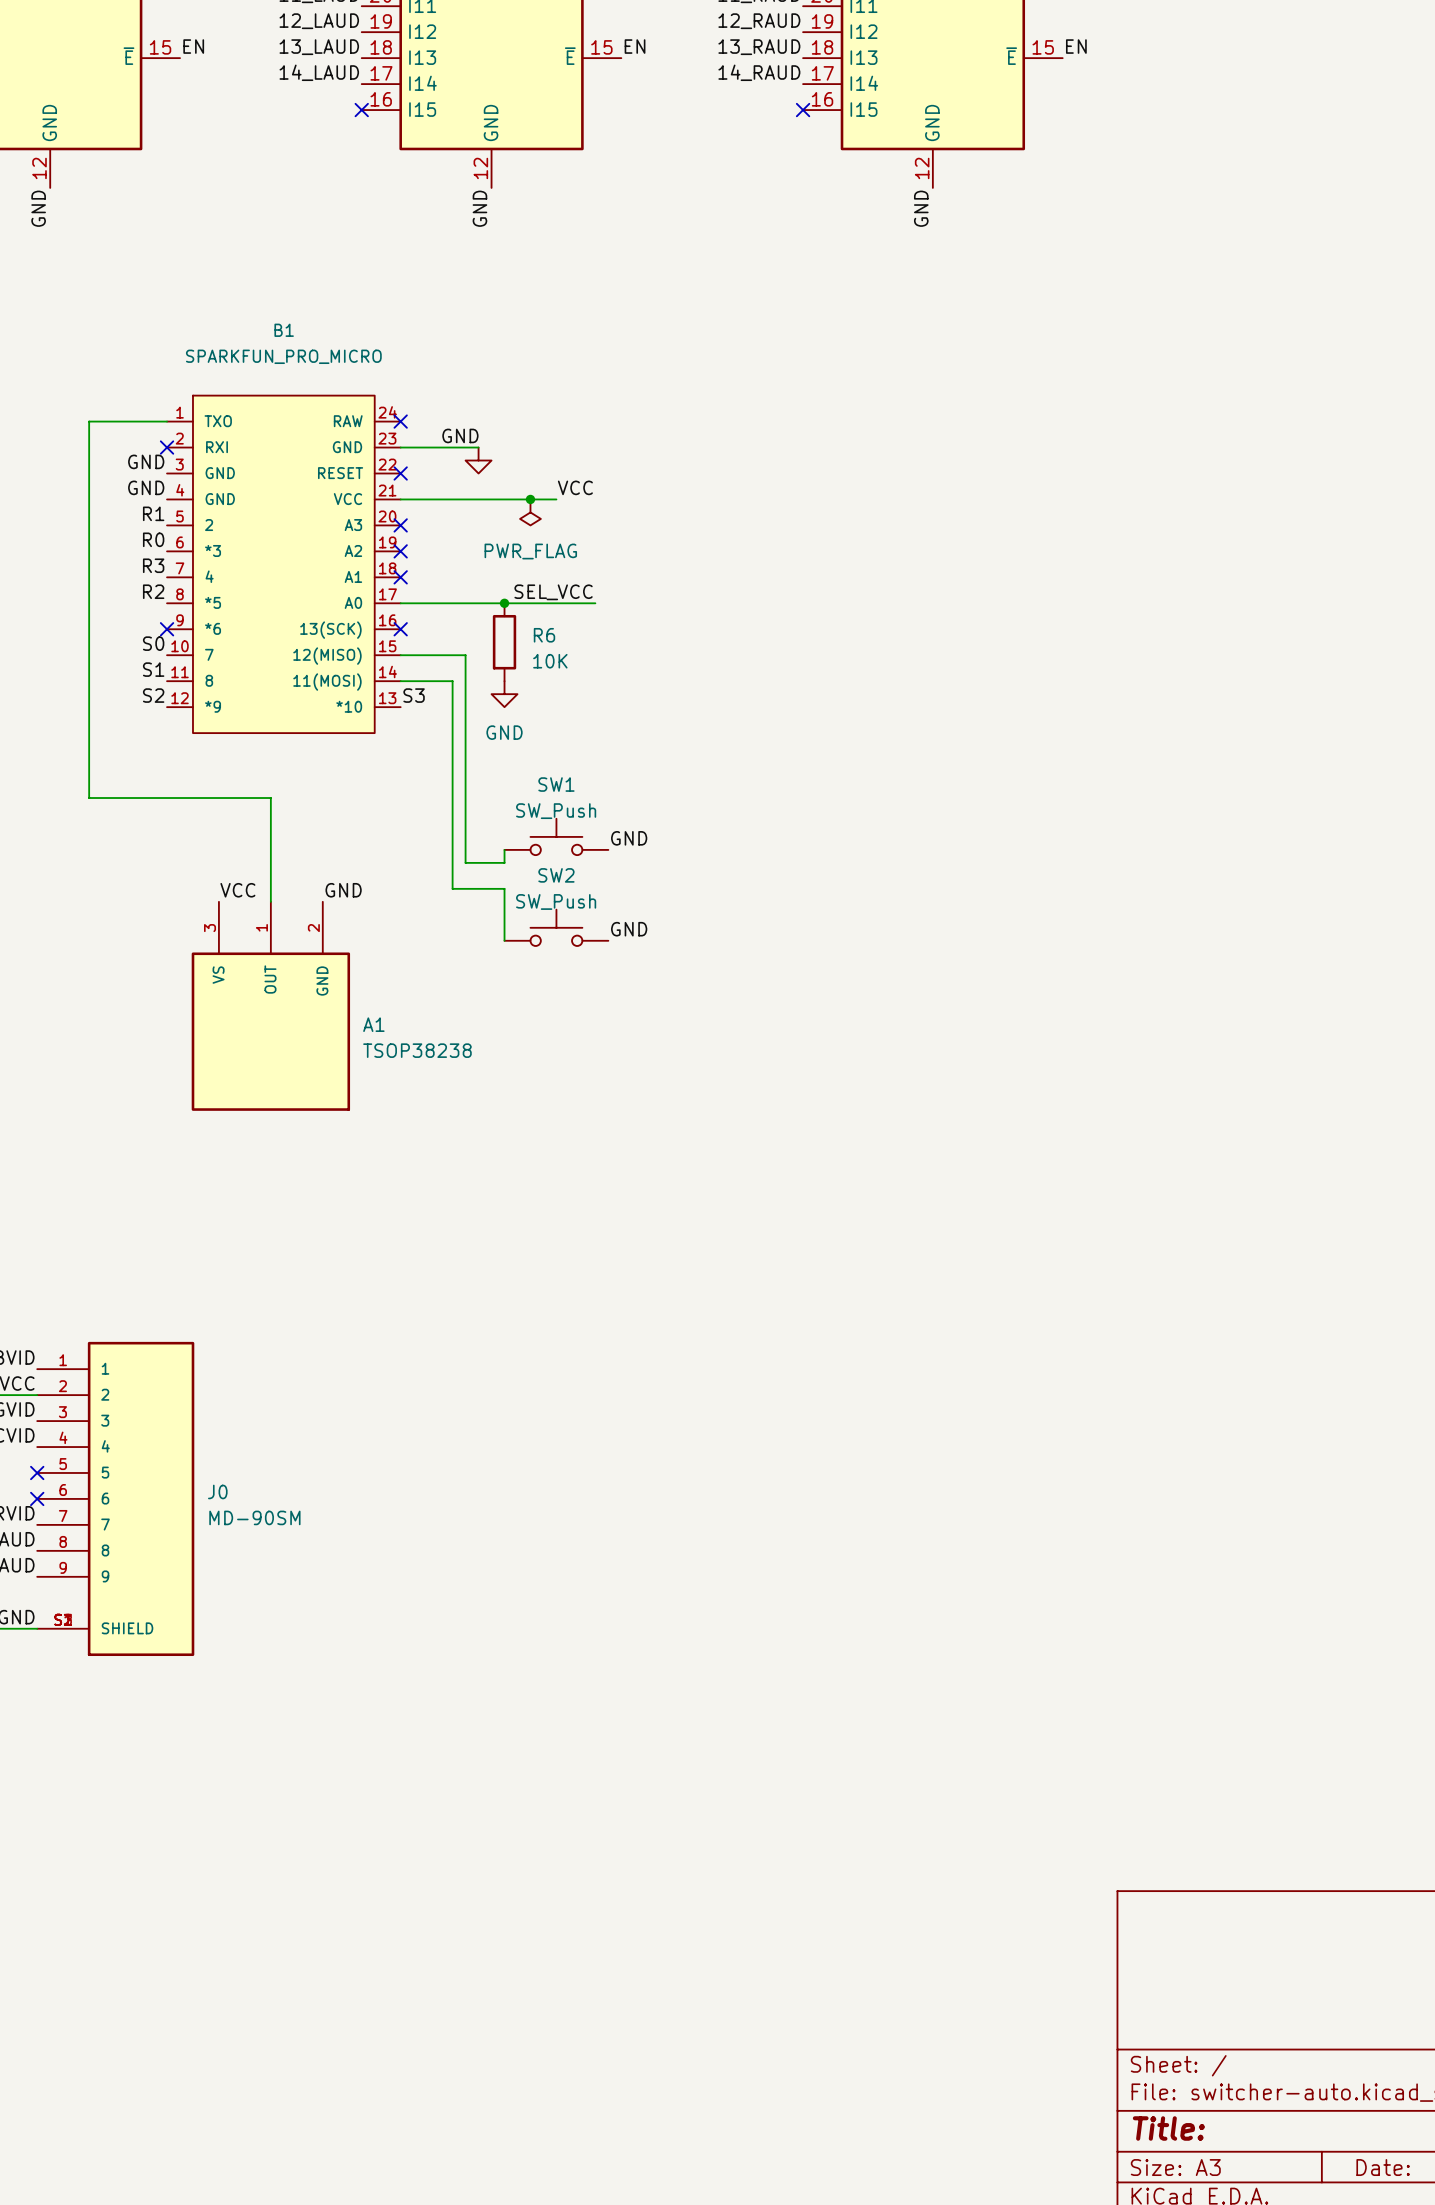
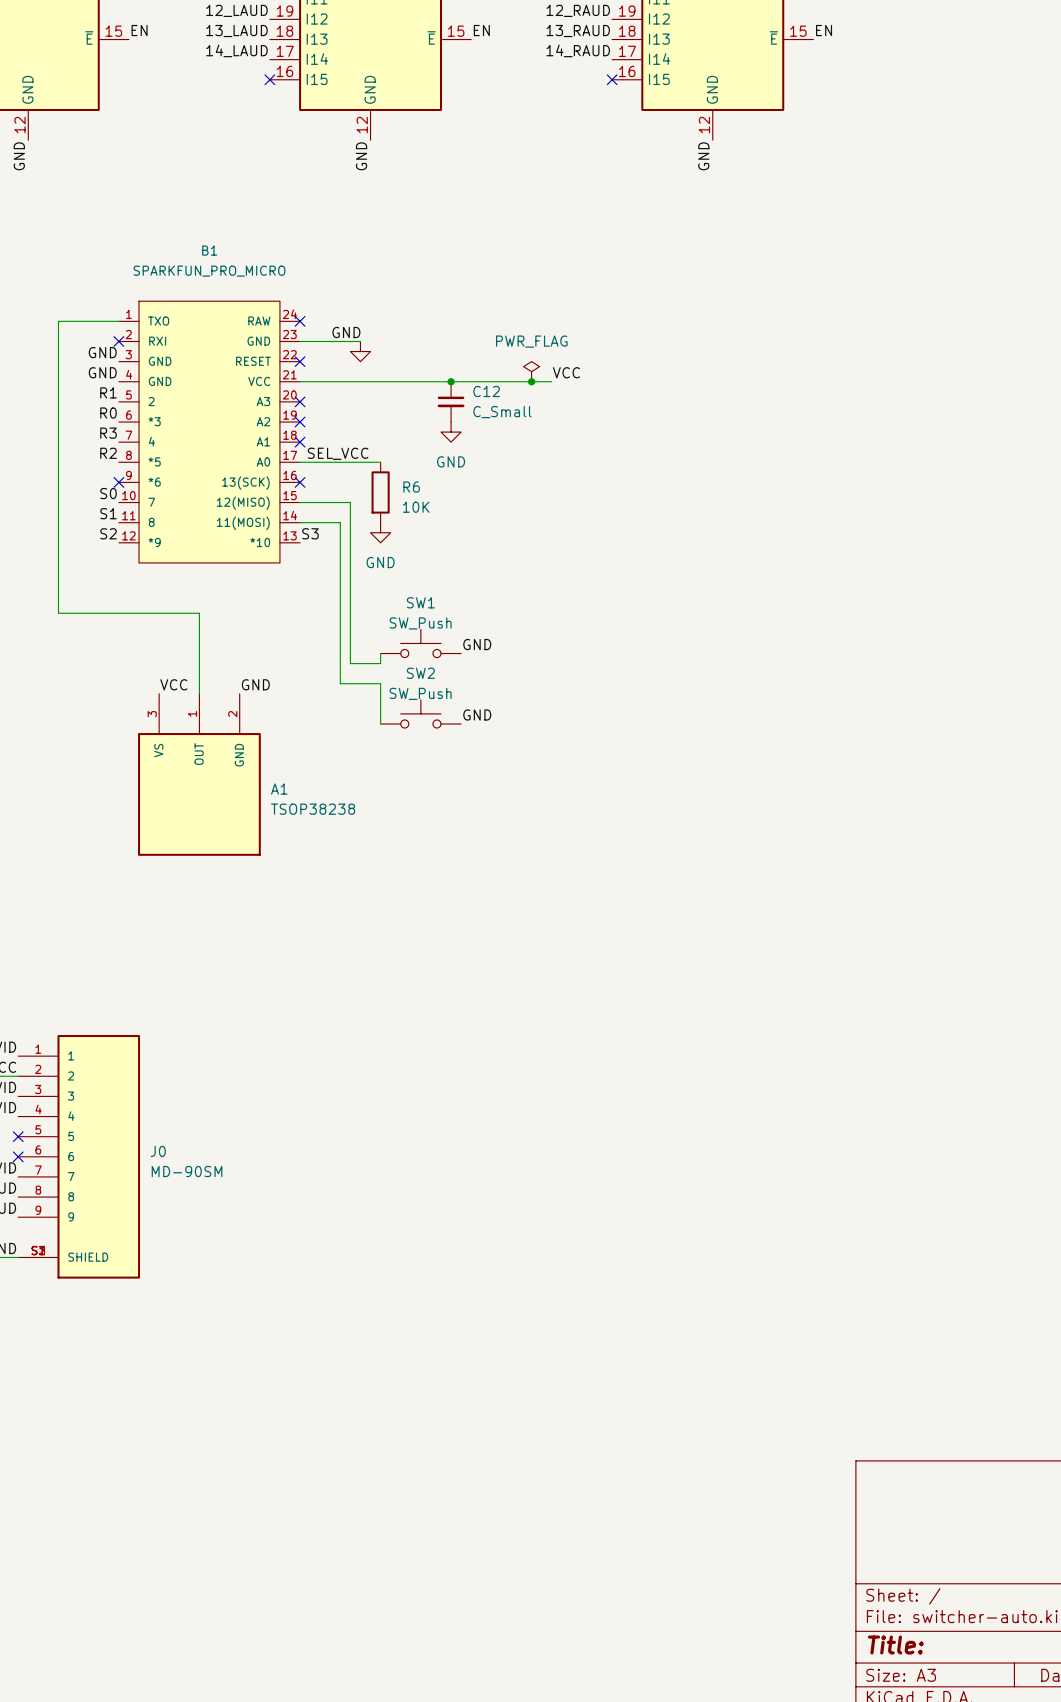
label position: VCC (575, 487) -> VCC (566, 372)
junction: (530, 499) -> none
wire: none -> (420, 381) (551, 381)
junction: none -> (451, 381)
junction: none -> (531, 381)
power symbol rotation: 0° (530, 512) -> 180° (531, 371)
power symbol position: PWR_FLAG (530, 512) -> PWR_FLAG (531, 371)
C12: none -> C_Small (451, 401)
power symbol: none -> GND (451, 432)
label position: SEL_VCC (553, 592) -> SEL_VCC (338, 453)
wire: (504, 603) (595, 603) -> none
junction: (504, 603) -> none

